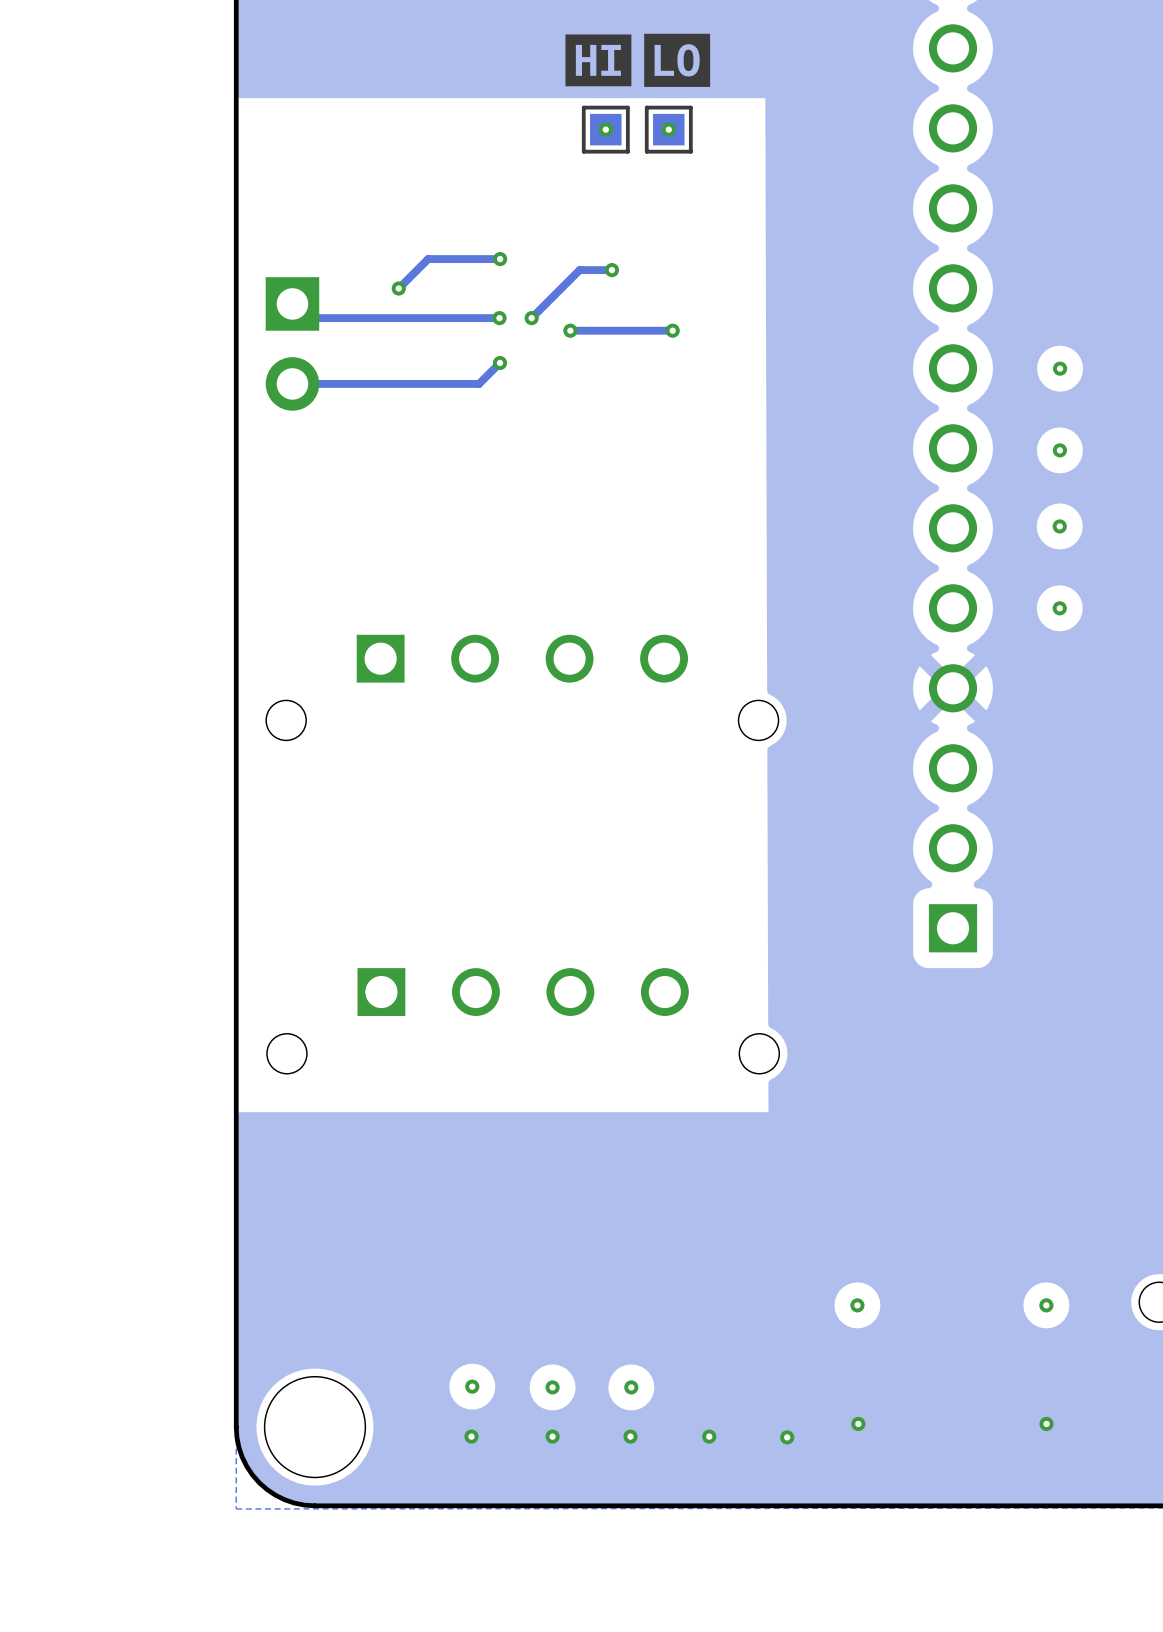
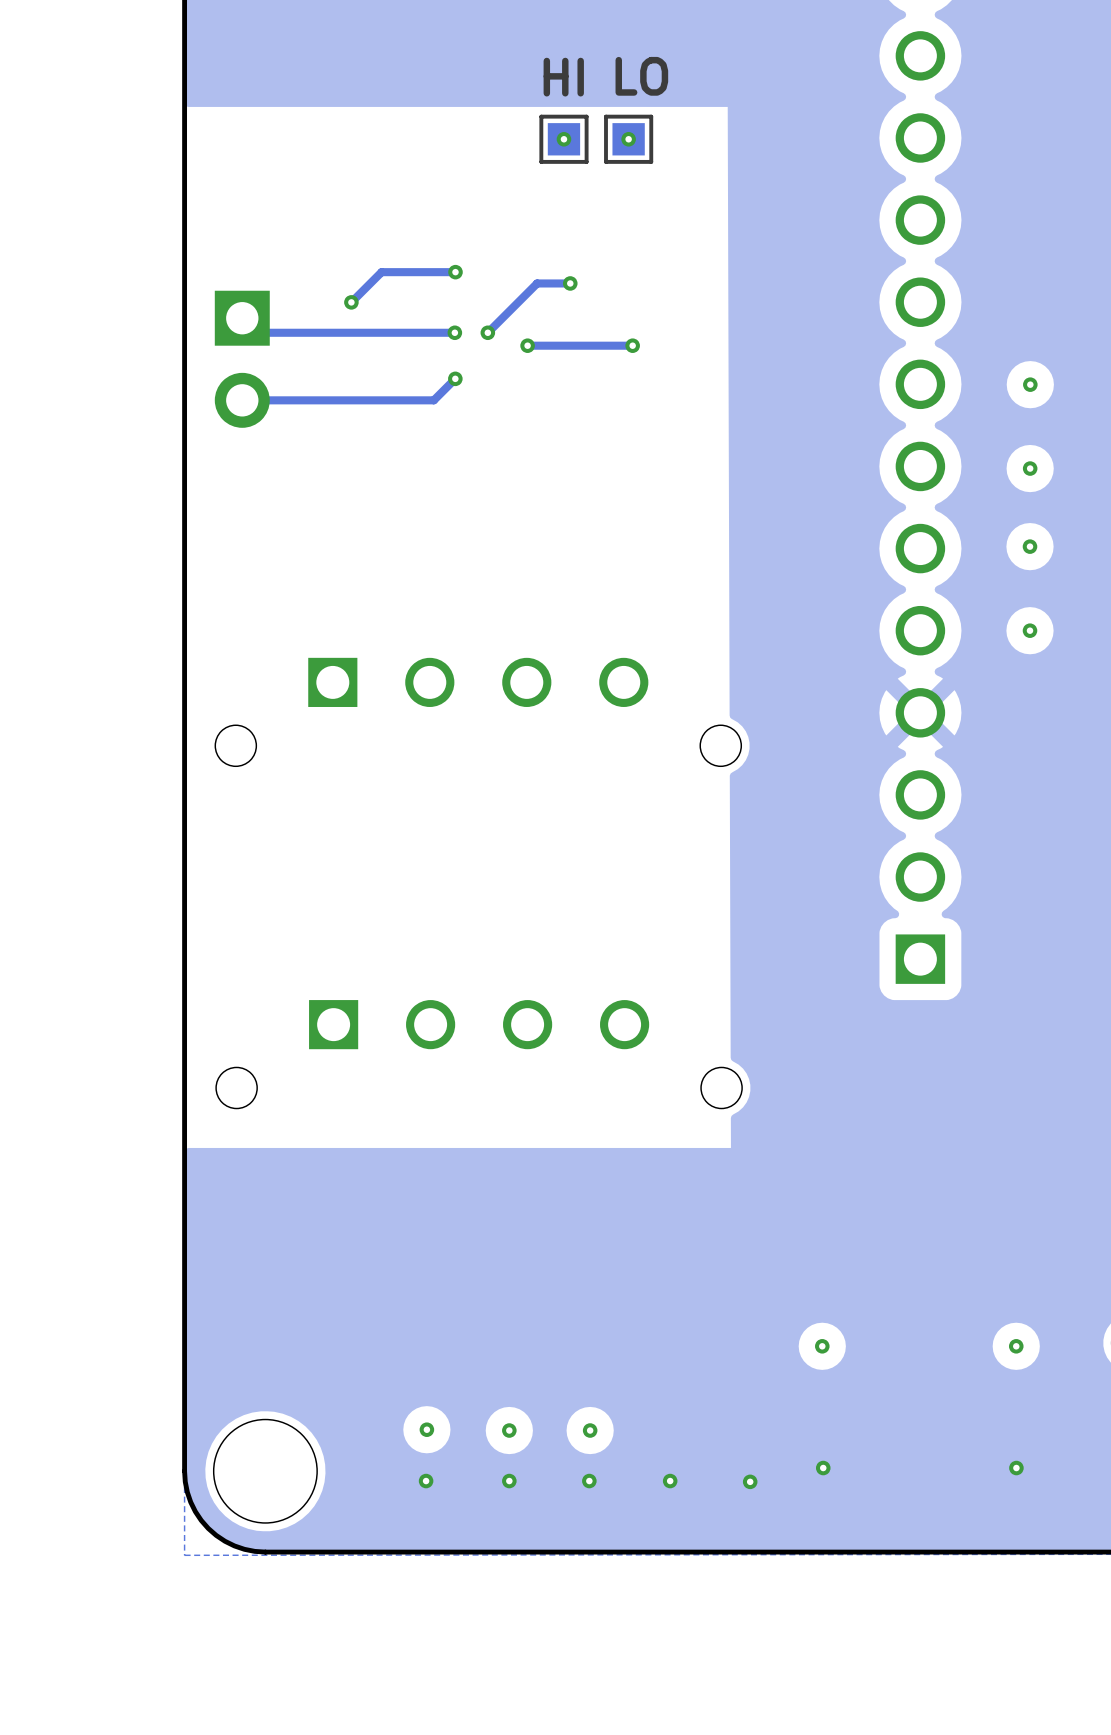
drawing: [565, 33, 711, 87] -> none
text: none -> LO (641, 76)
text: none -> HI (563, 77)

